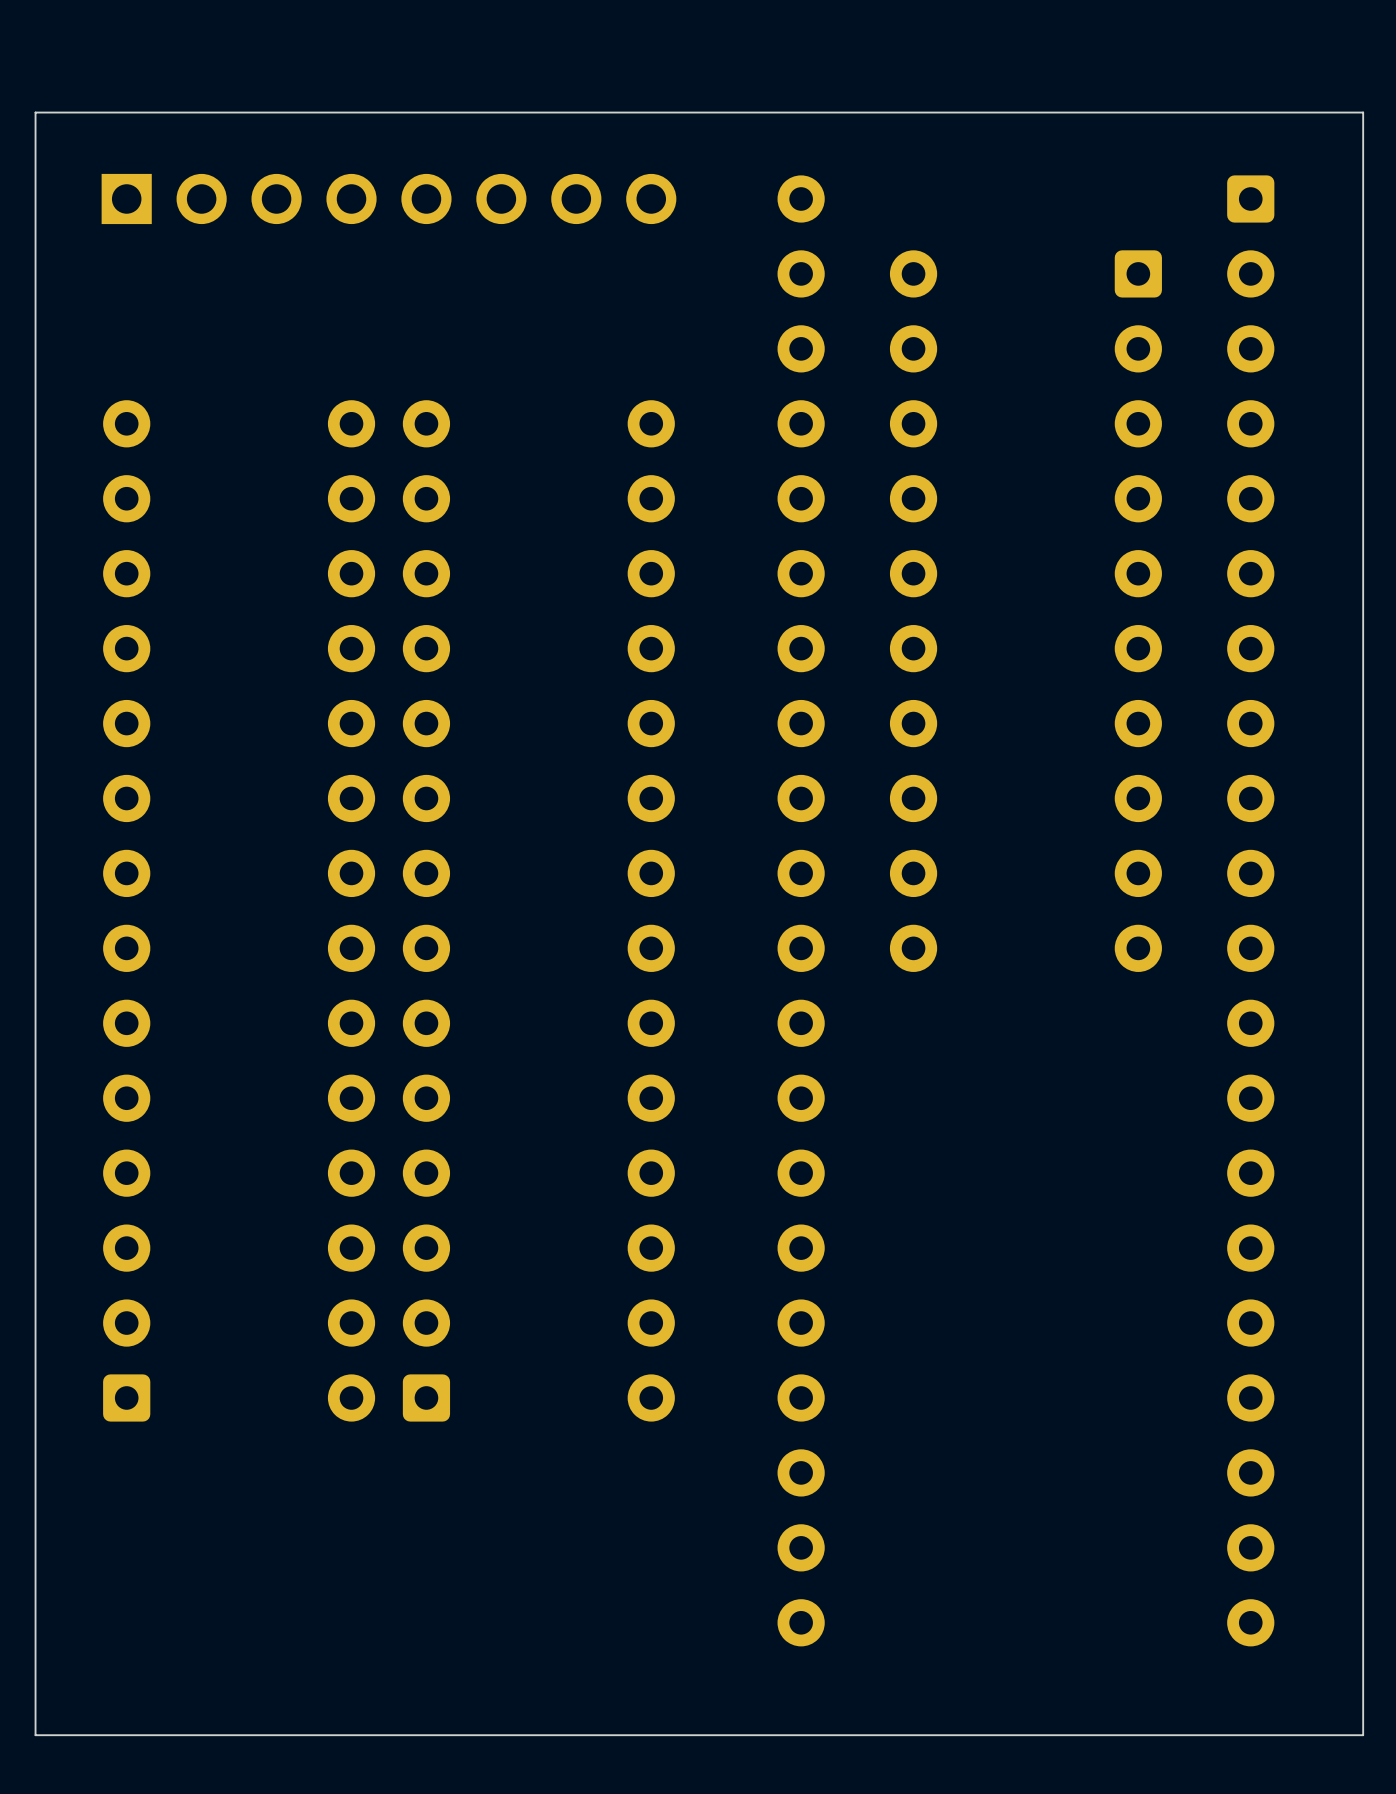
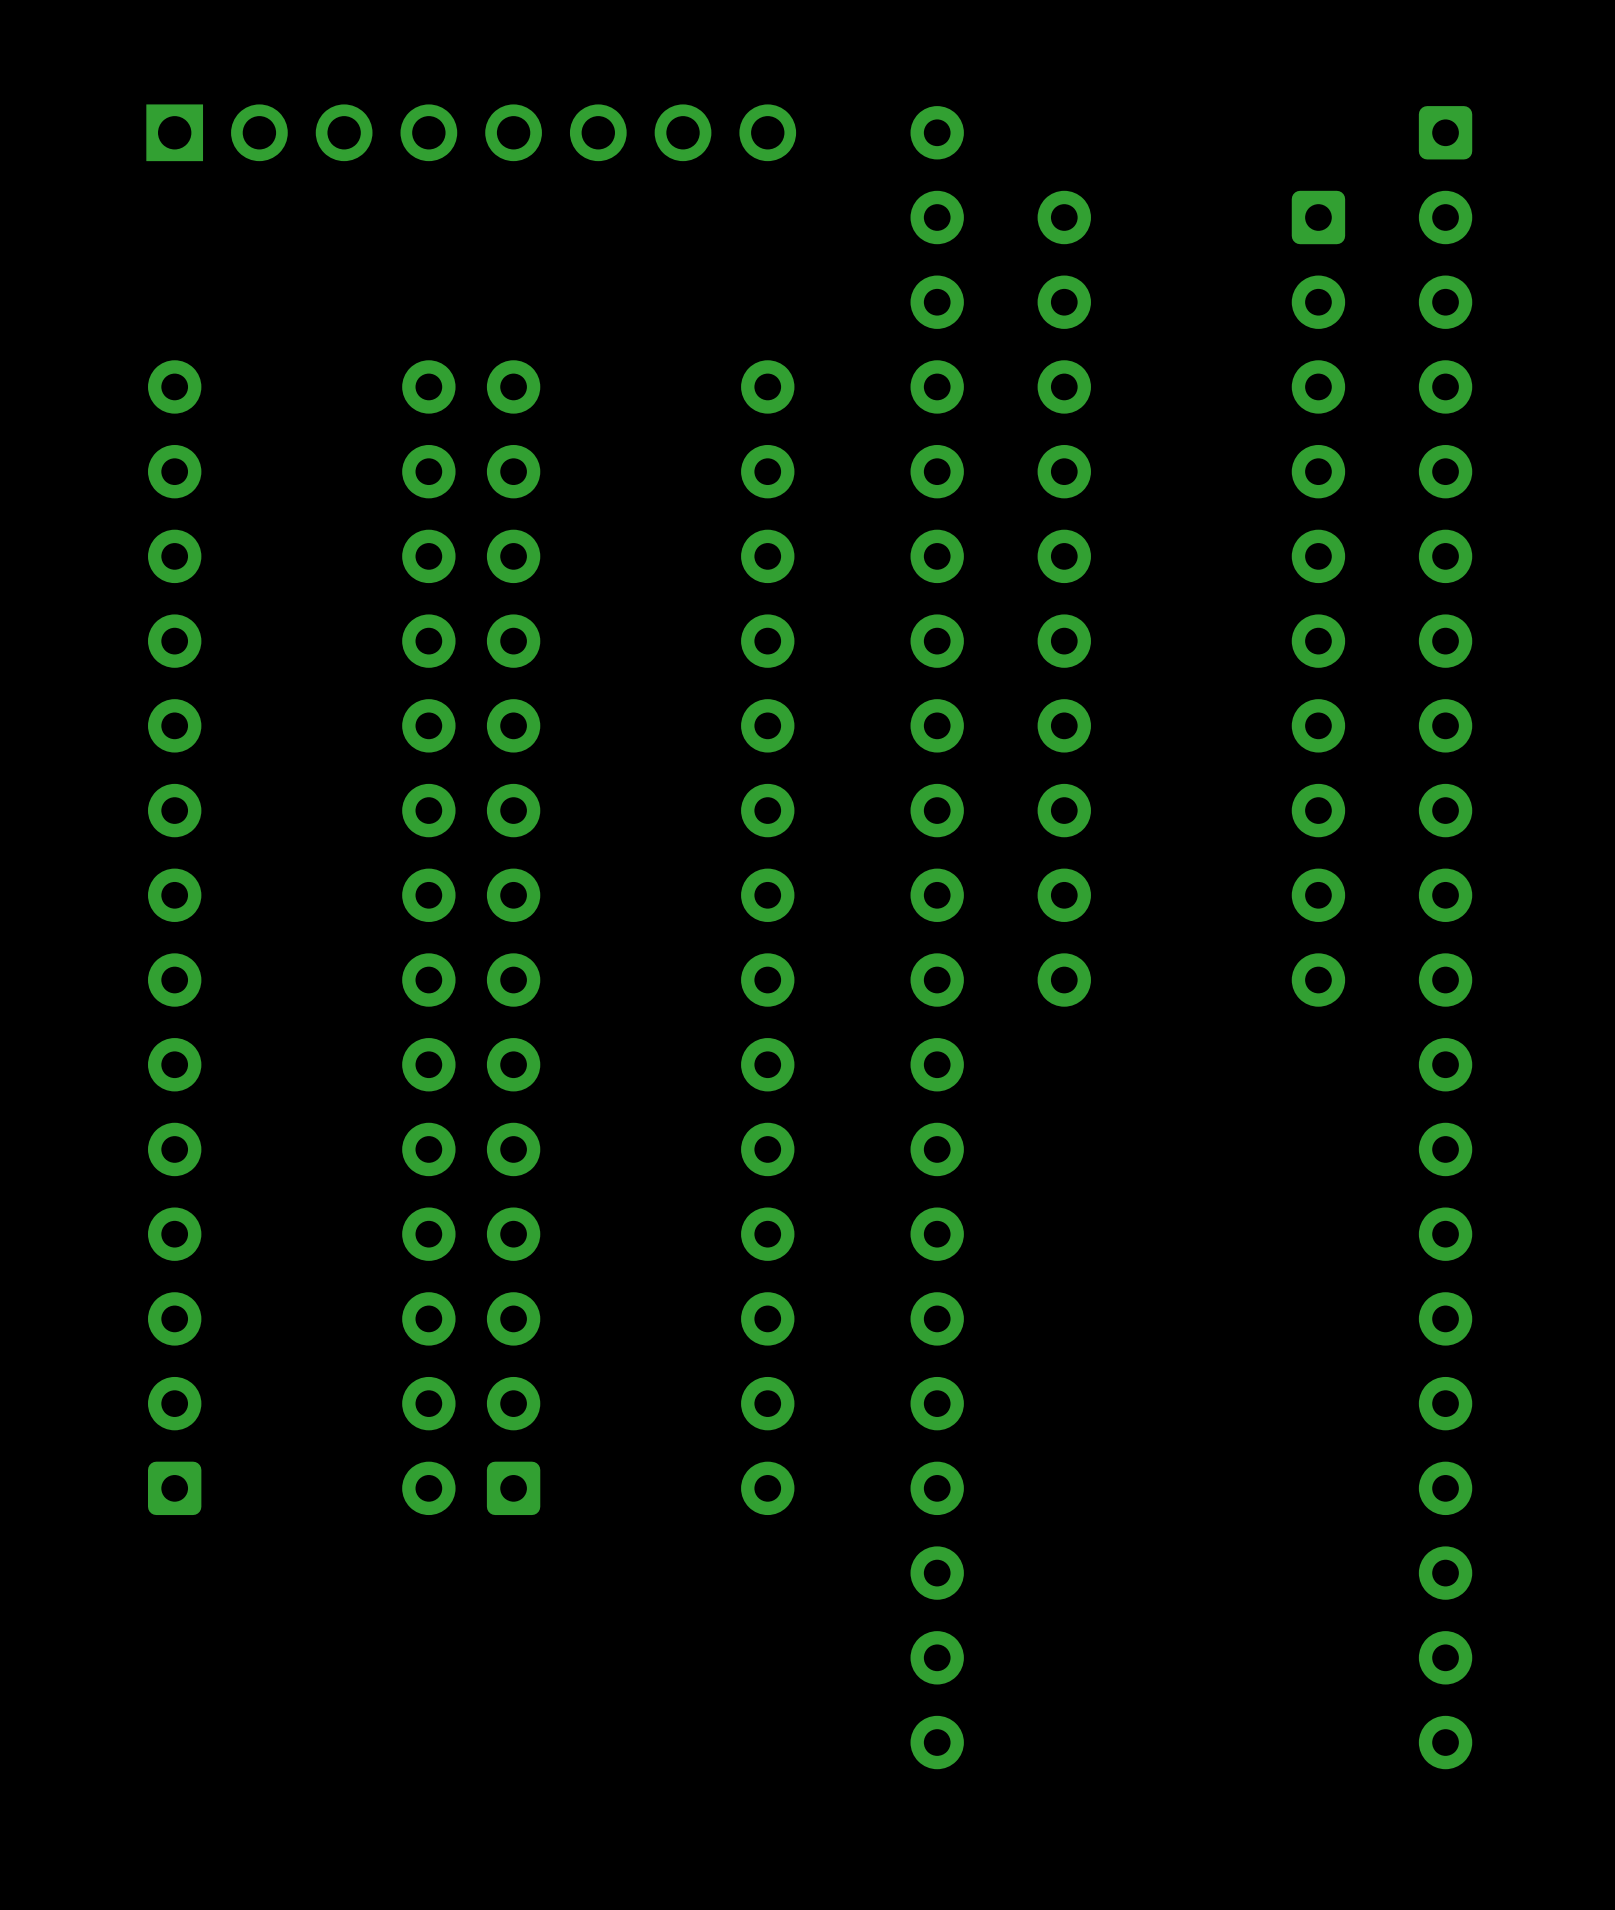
board edge: (1363, 112) (35, 112) (35, 1735) (1363, 1735) (1363, 112) -> none

